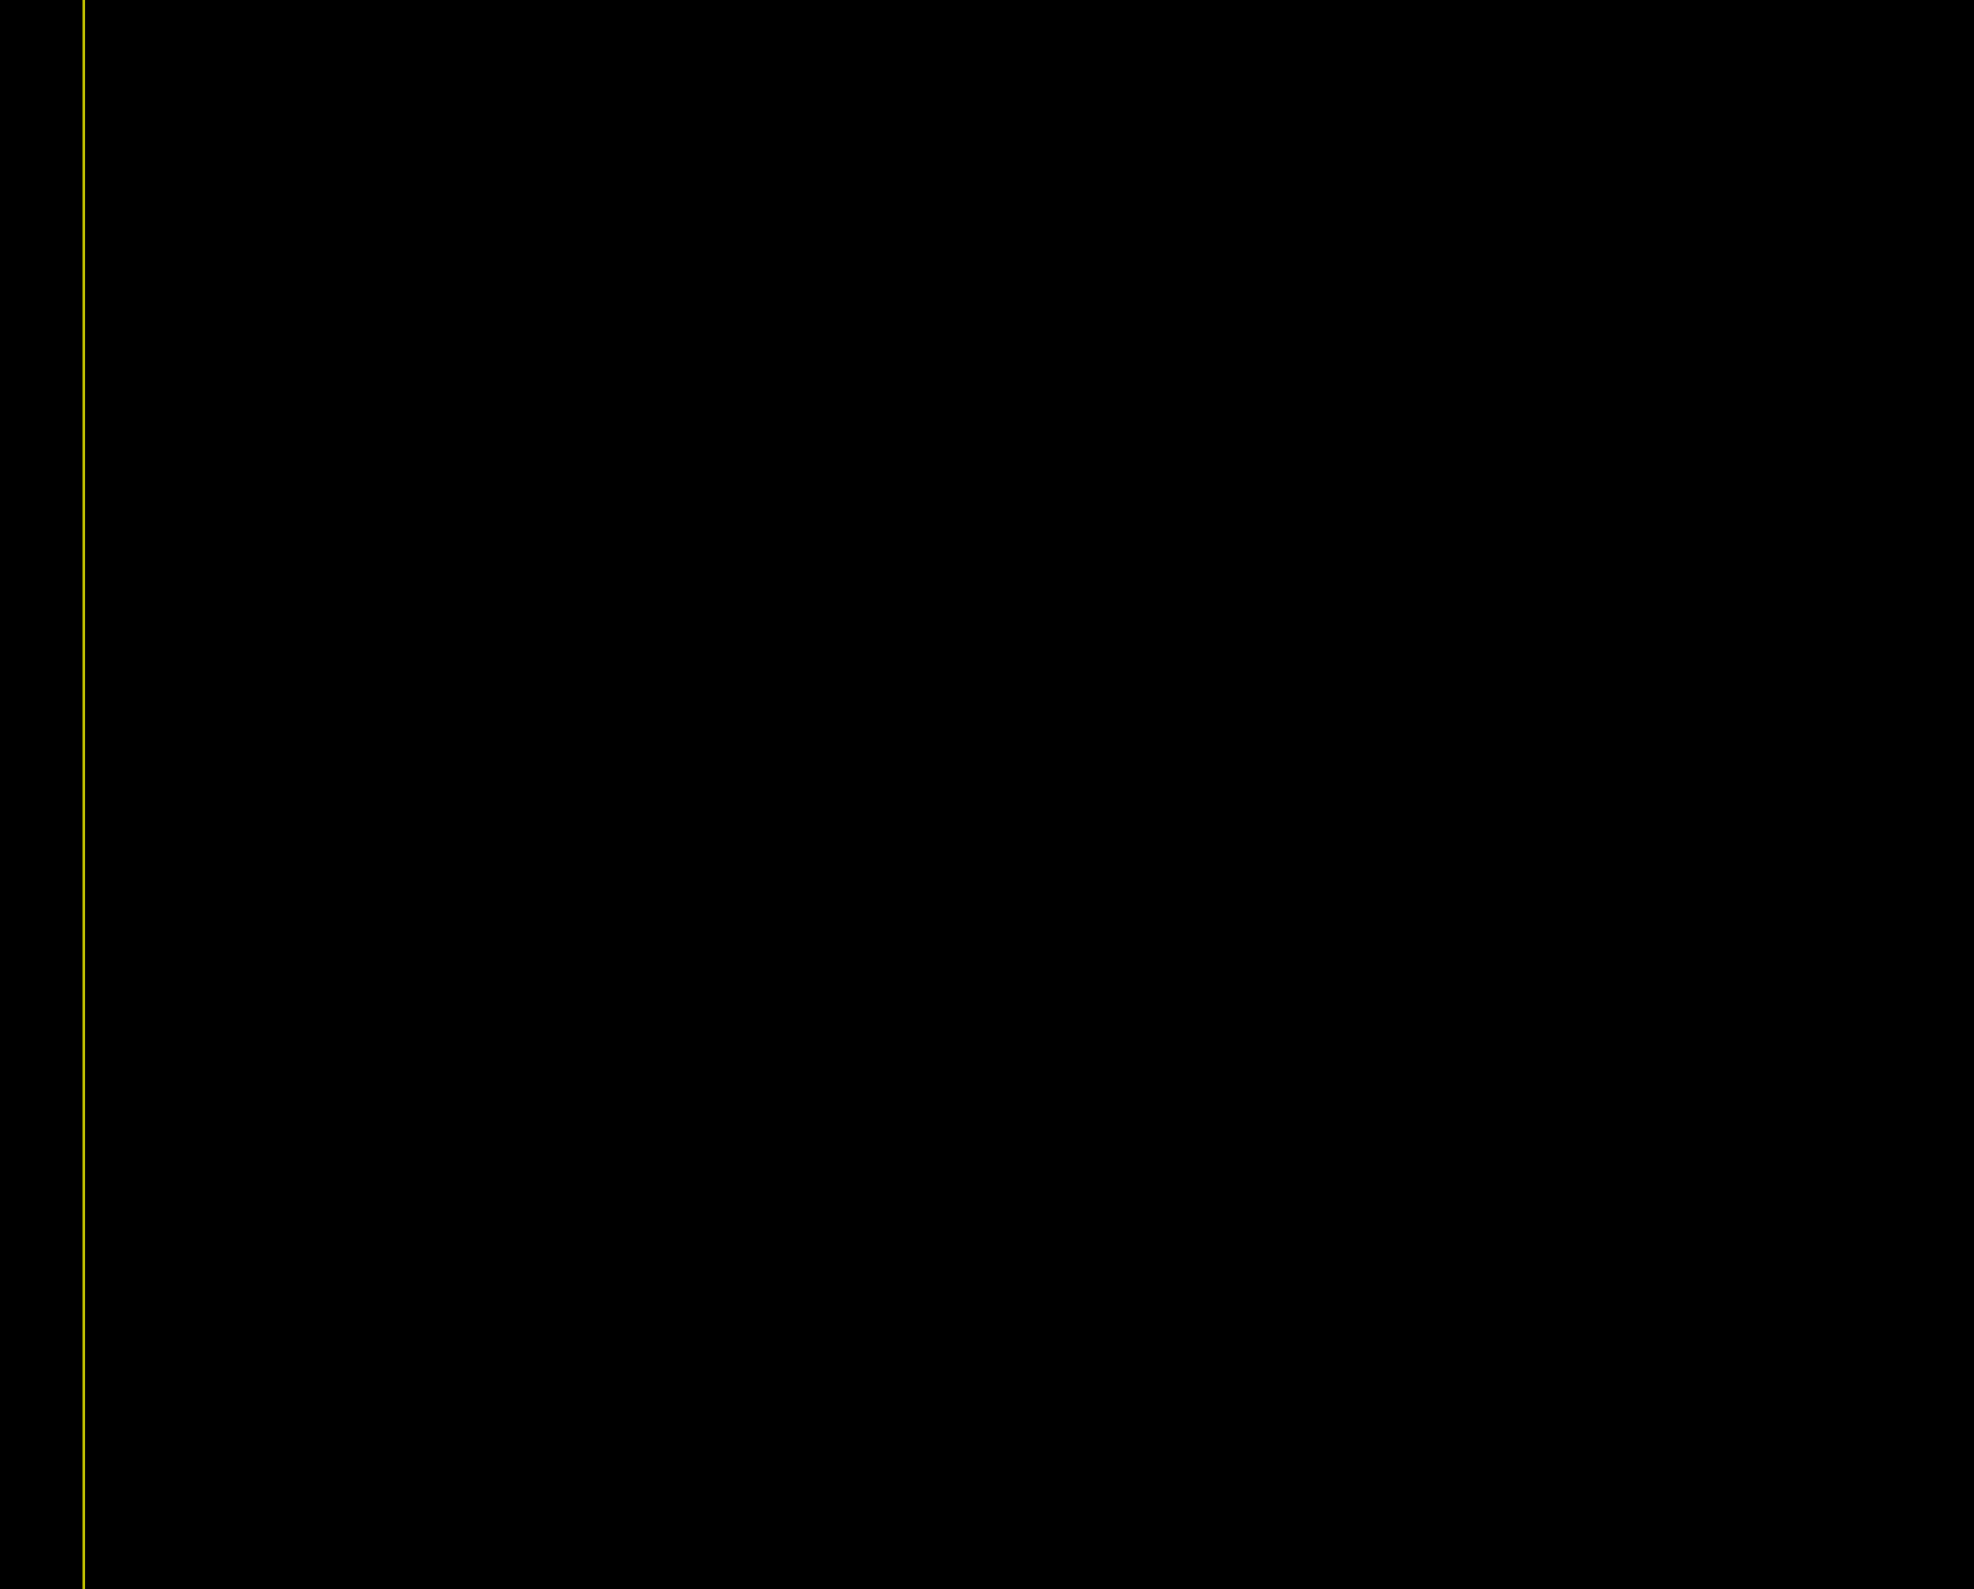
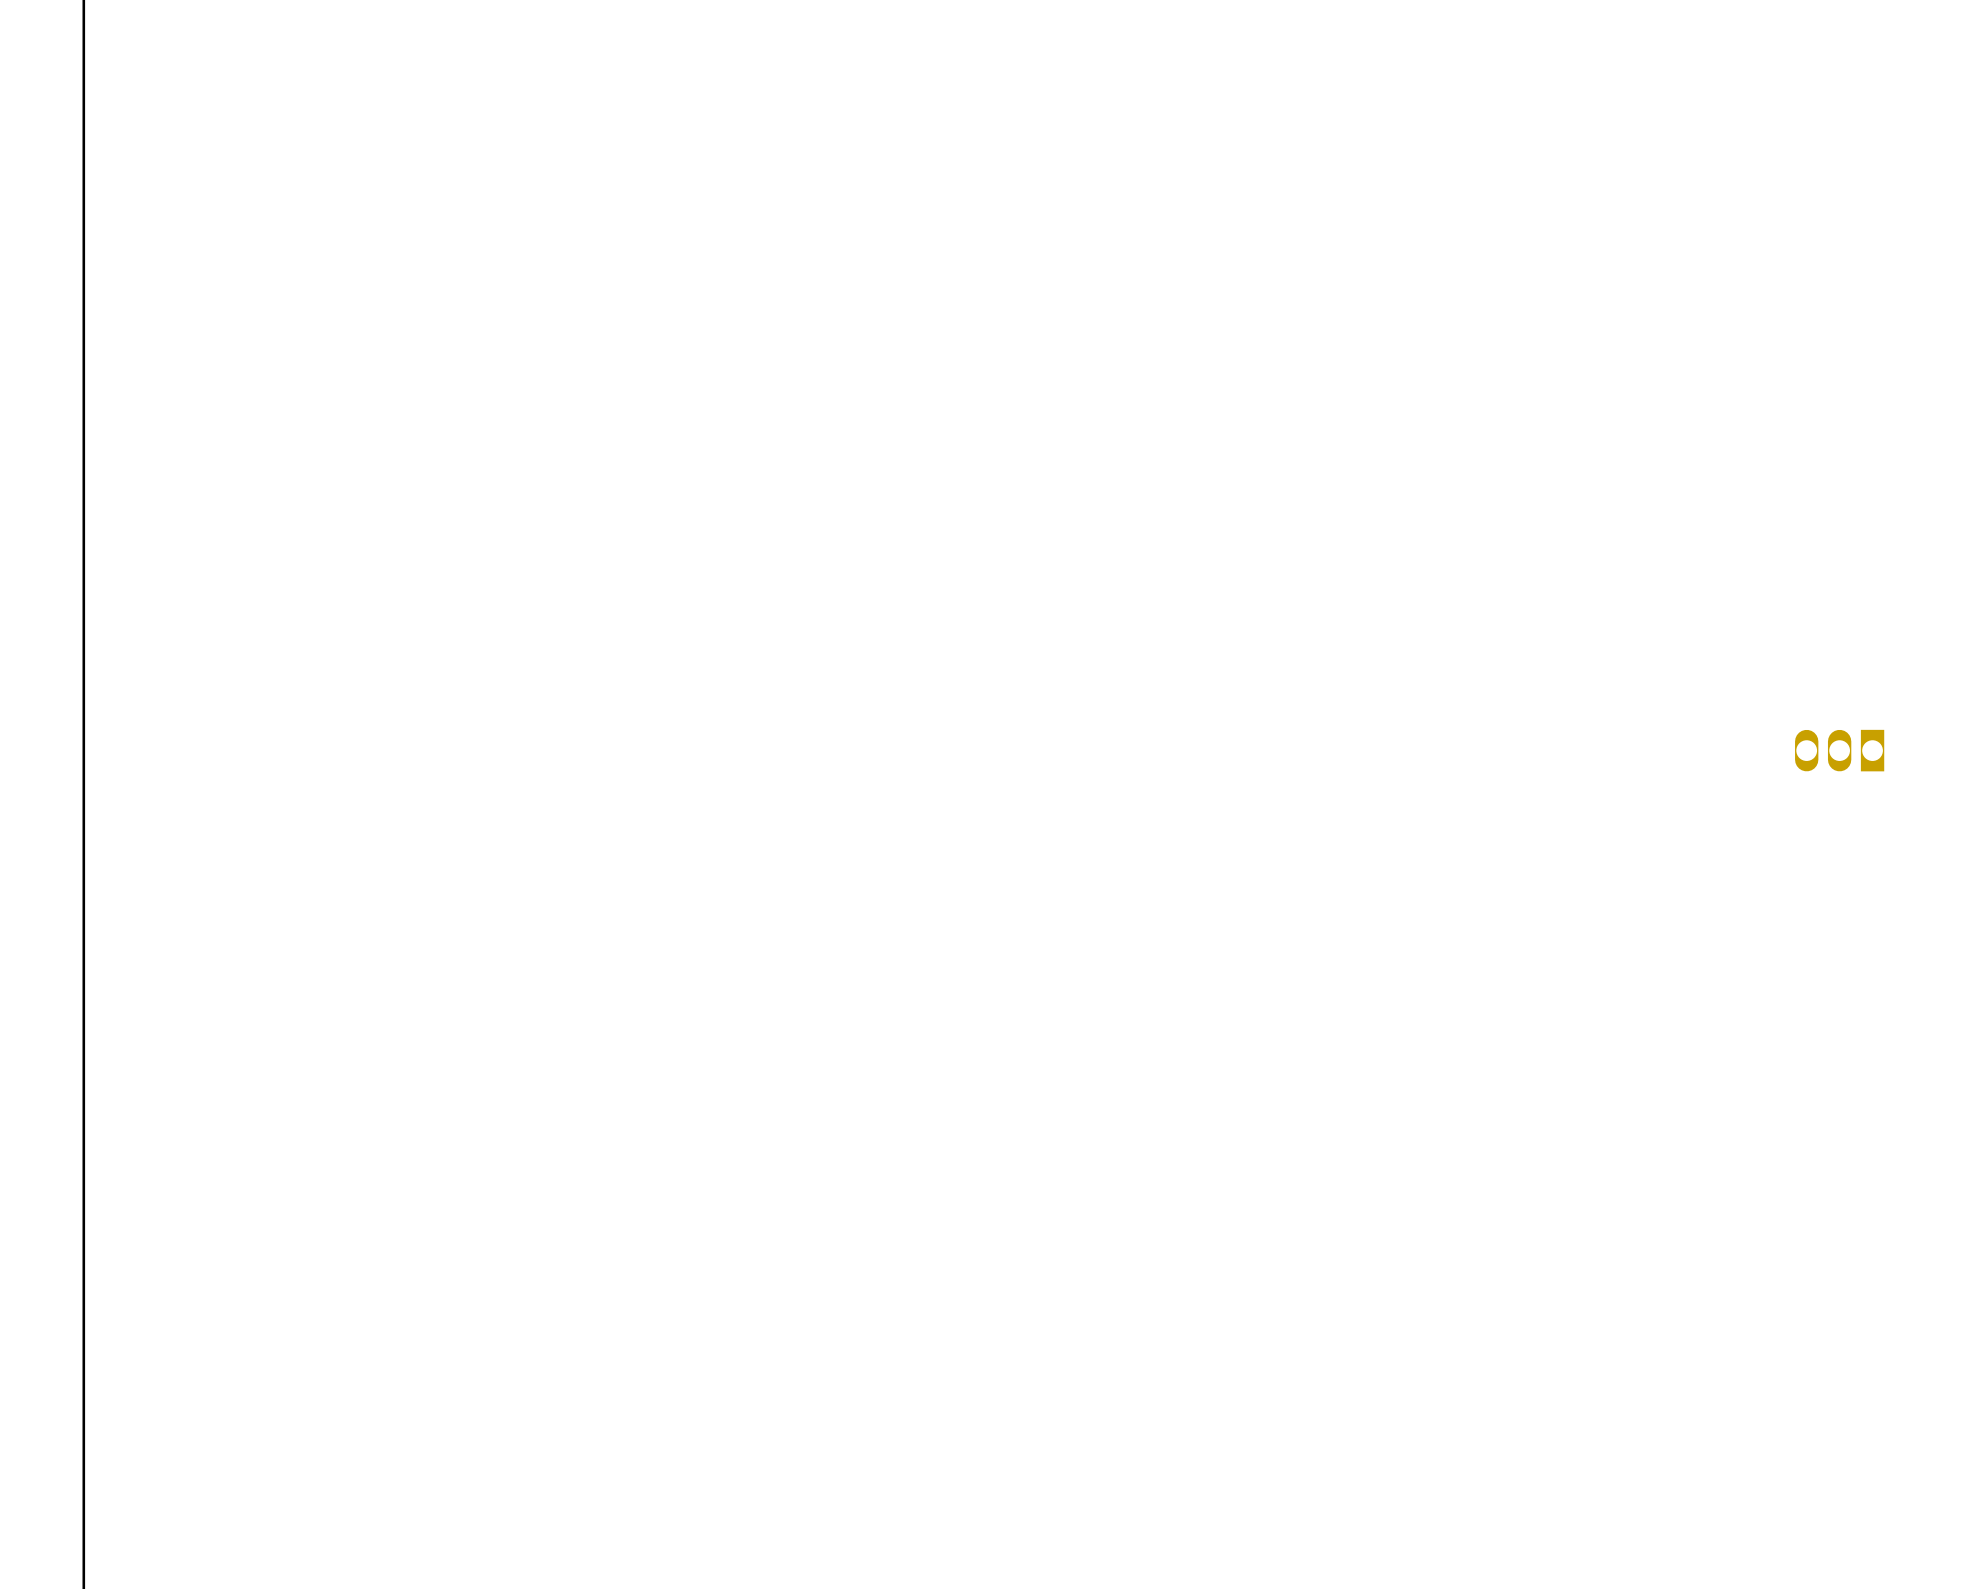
part: none -> (1839, 750)

